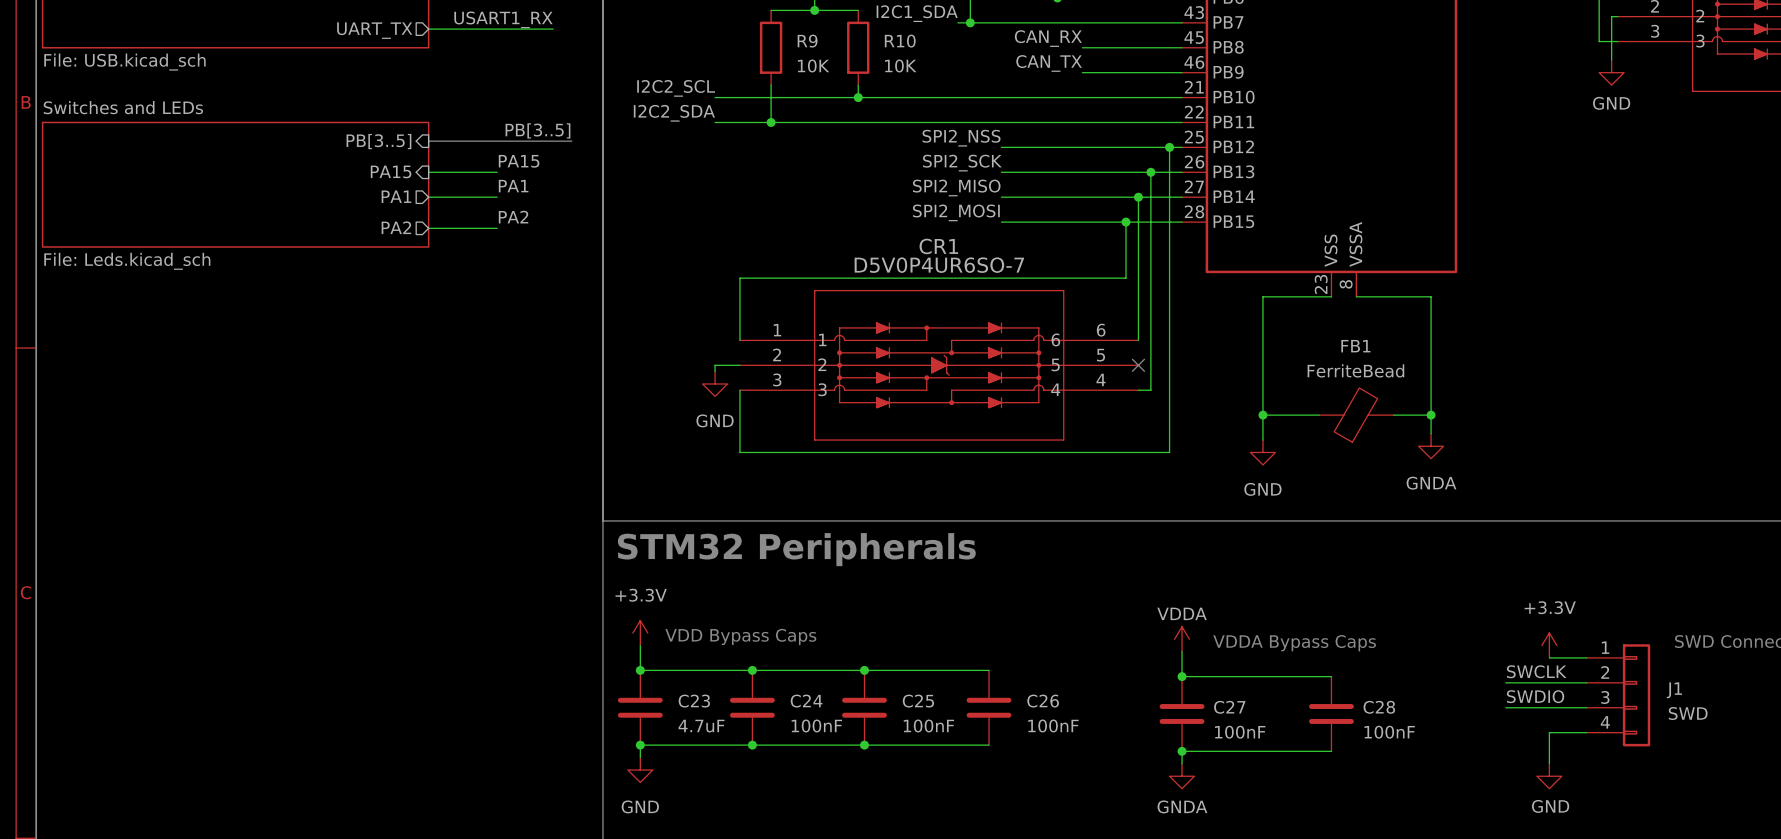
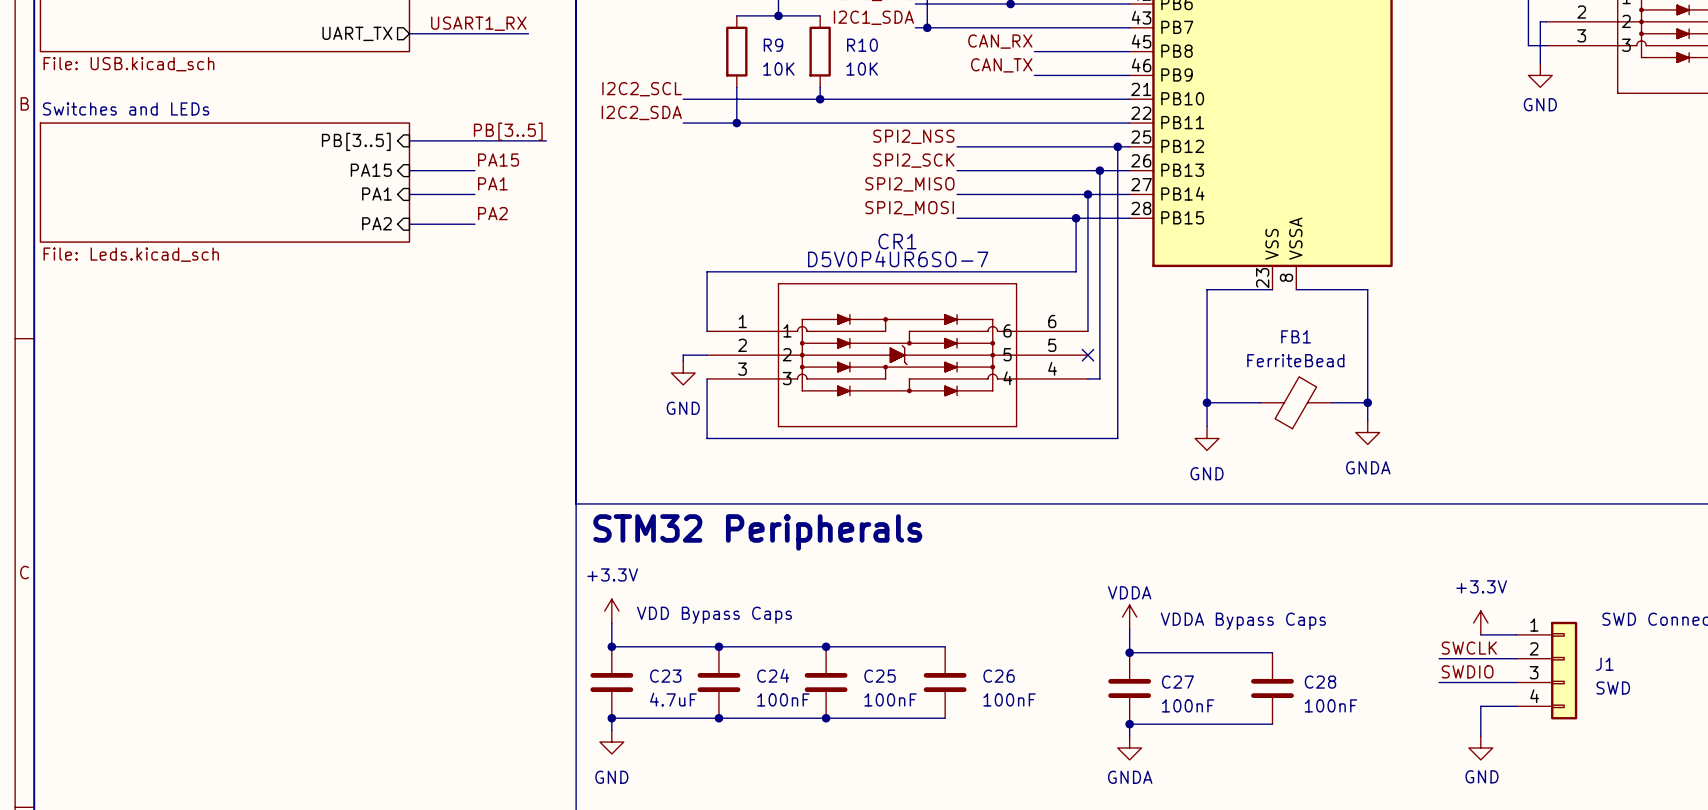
sheet pin shape: output (396, 196) -> input (376, 194)
sheet pin shape: output (396, 227) -> input (376, 223)

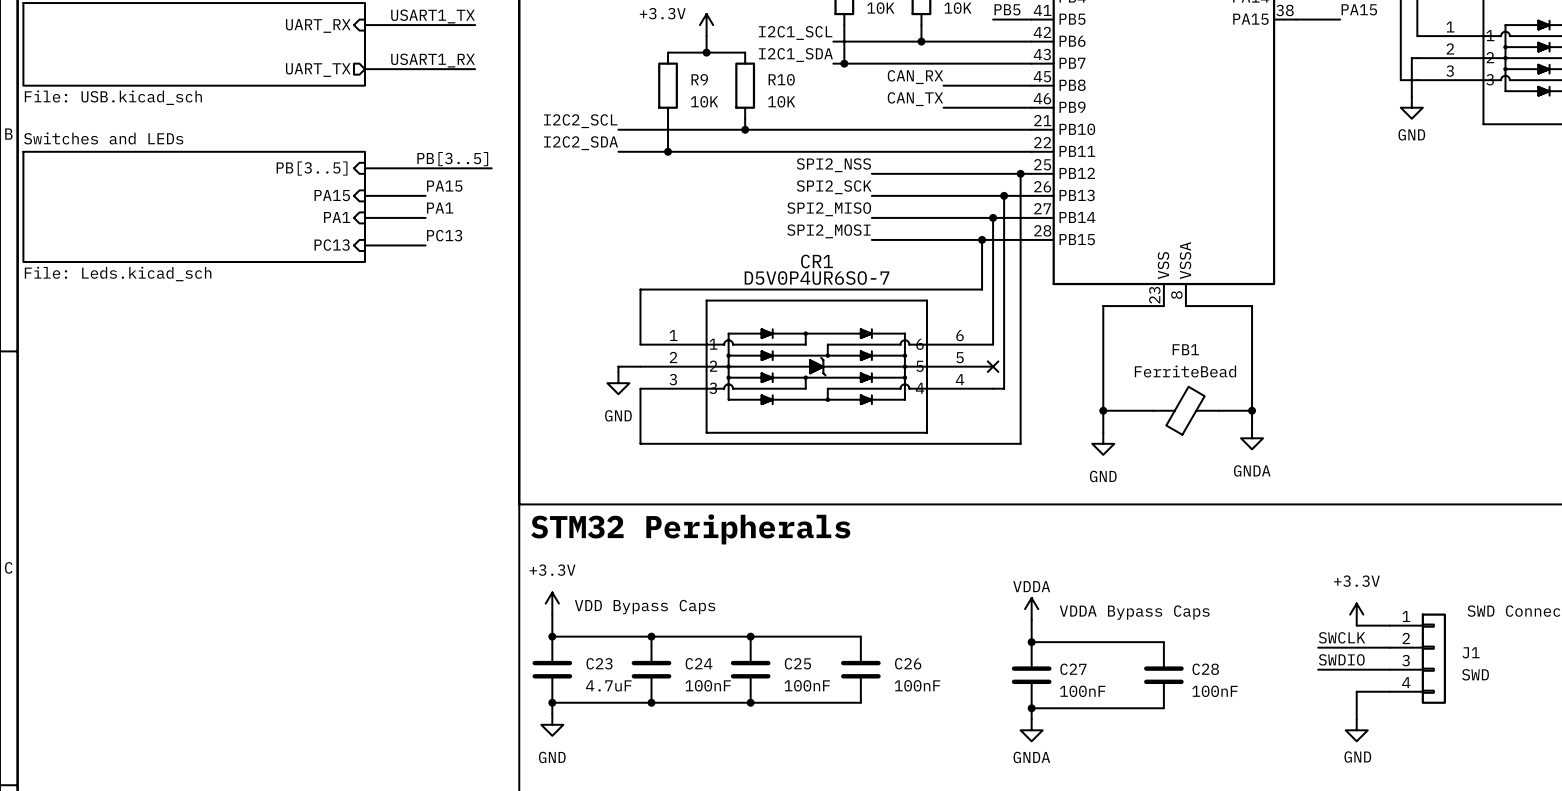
label: PA2 (492, 213) -> PC13 (444, 235)
sheet pin: PA2 (376, 223) -> PC13 (332, 245)

